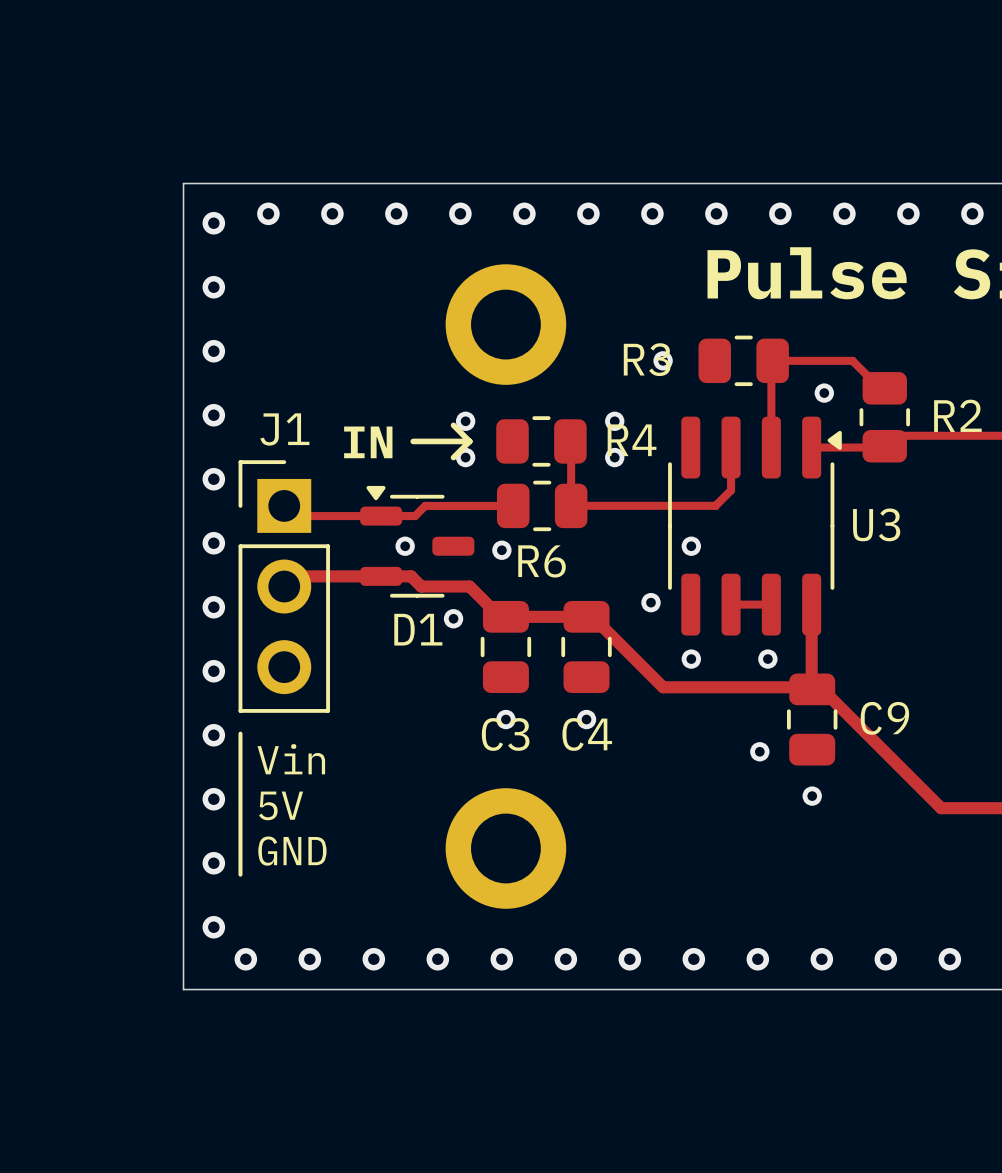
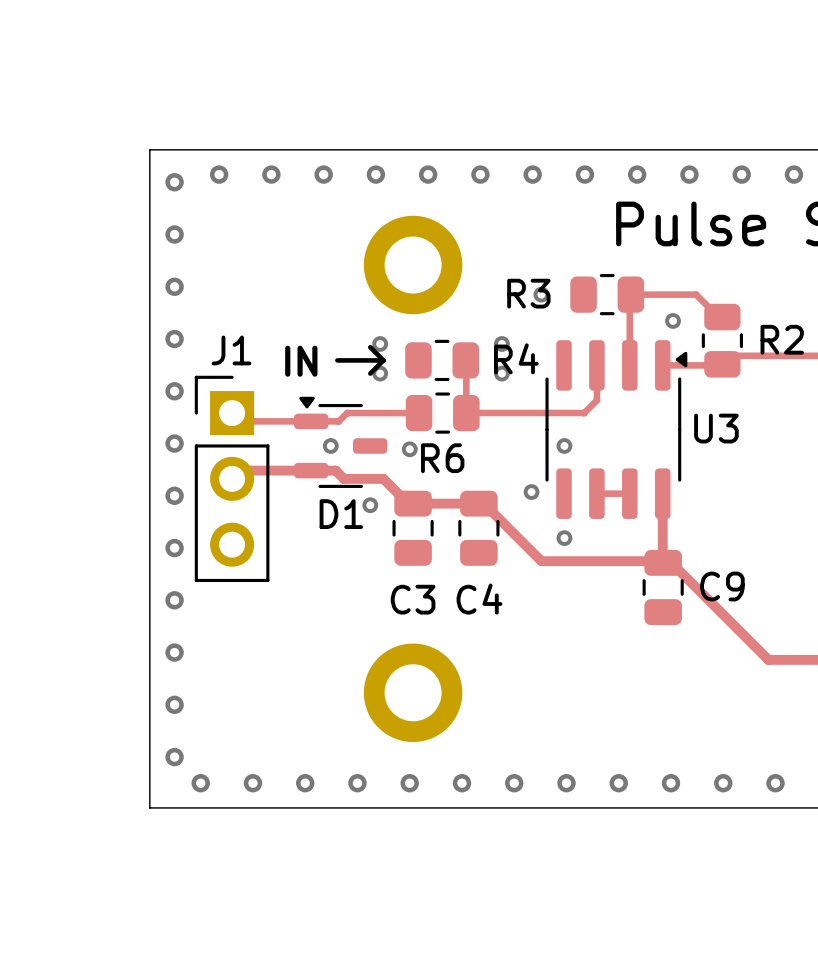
via: (767, 659) -> none
via: (505, 719) -> none
via: (586, 719) -> none
line: (240, 733) (240, 874) -> none
via: (759, 751) -> none
text: Vin (291, 759) -> none
via: (812, 796) -> none
text: 5V (281, 805) -> none
text: GND (292, 851) -> none

